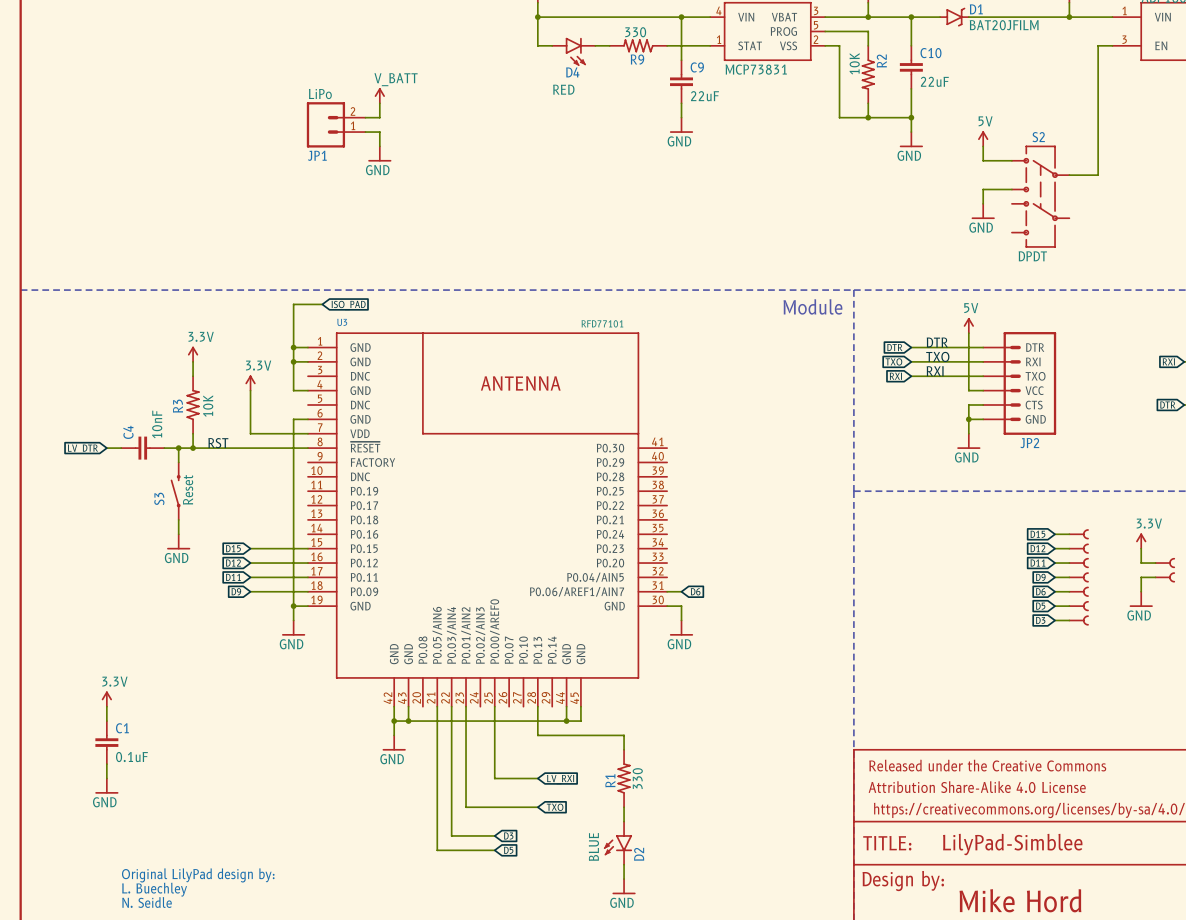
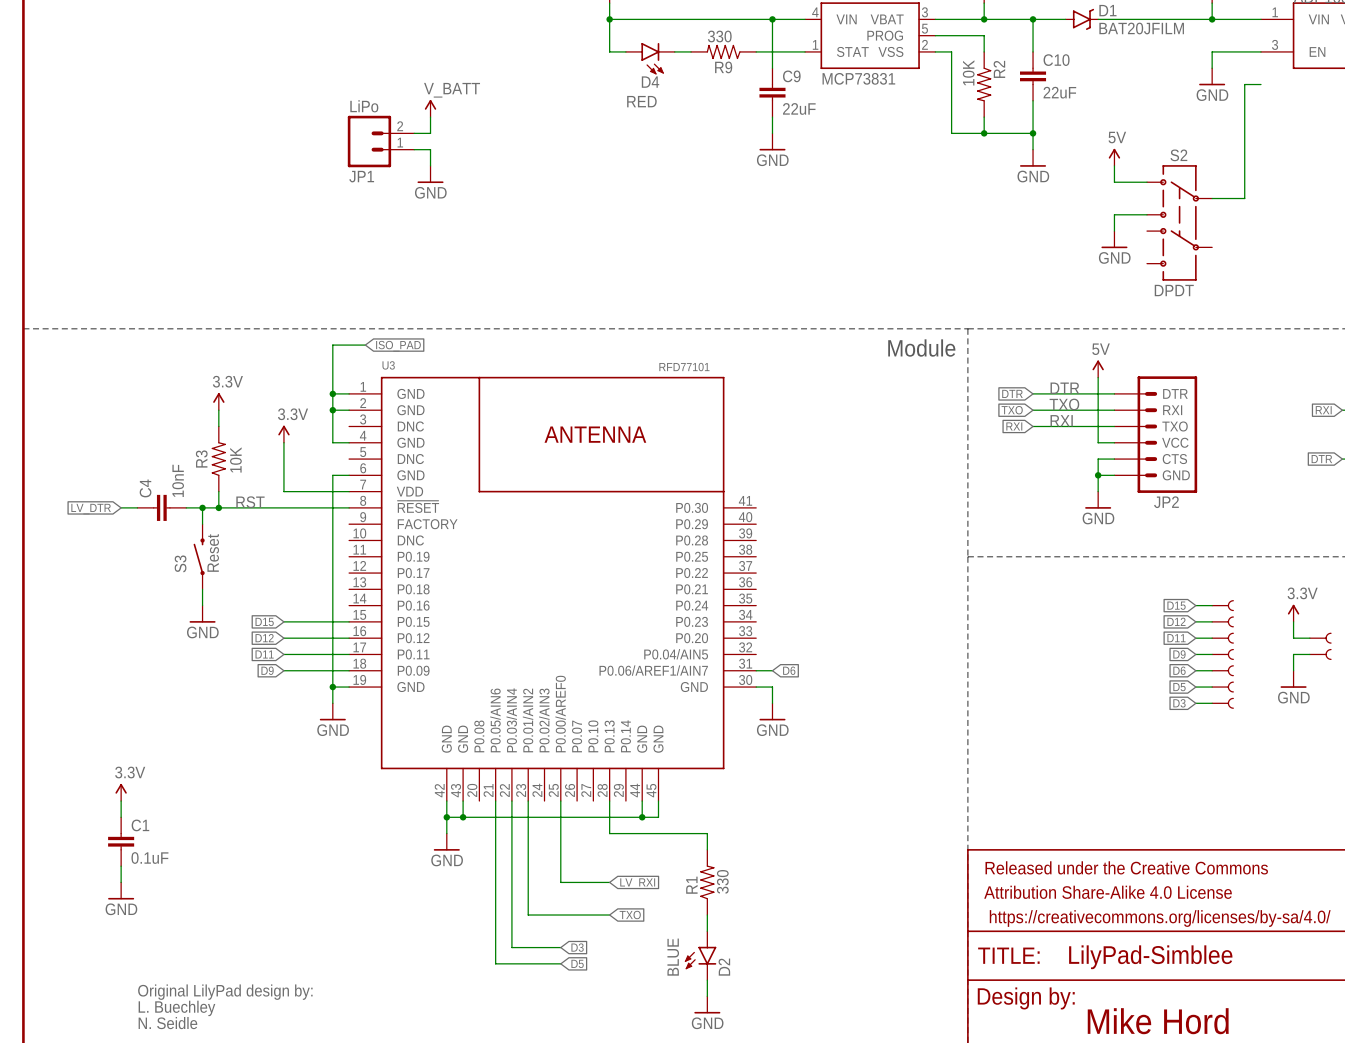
wire: (1098, 45) (1098, 74) -> (1244, 51) (1212, 51) (1212, 68)
power symbol: none -> GND (1212, 76)
wire: none -> (1244, 84) (1261, 84)

